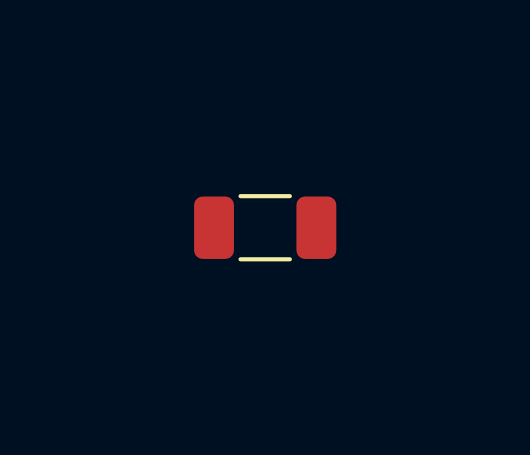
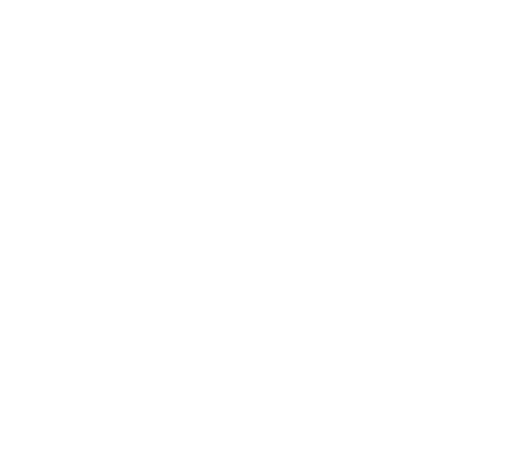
part: (265, 227) -> none

